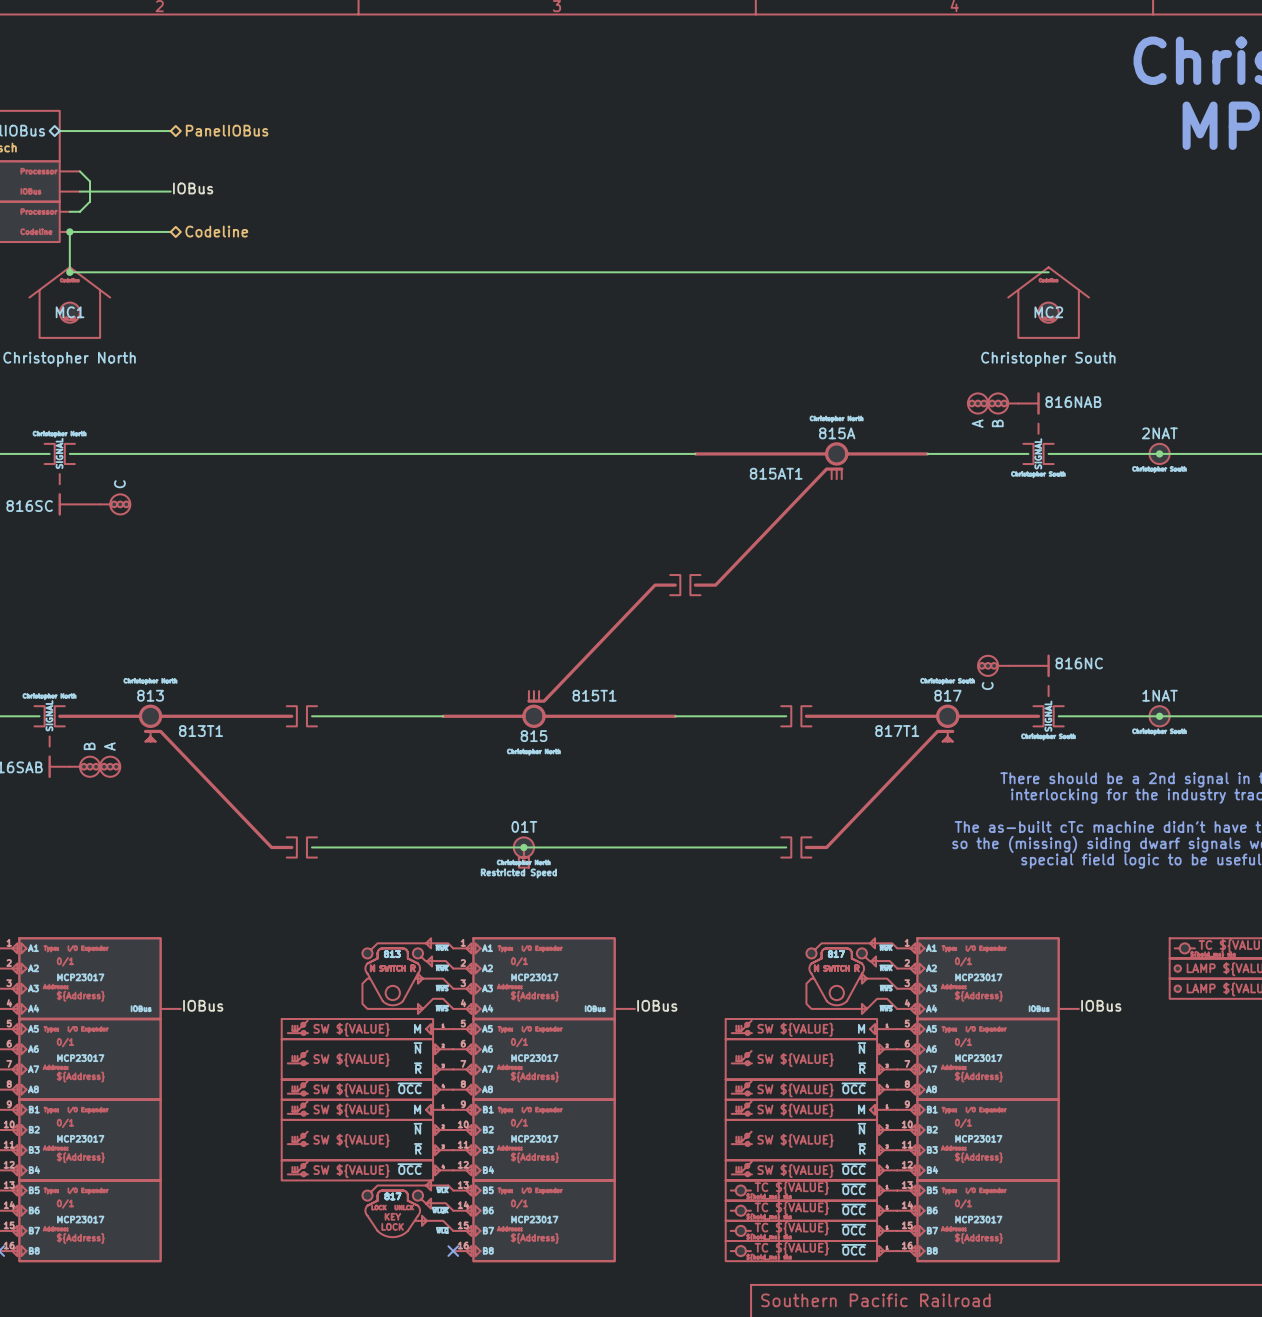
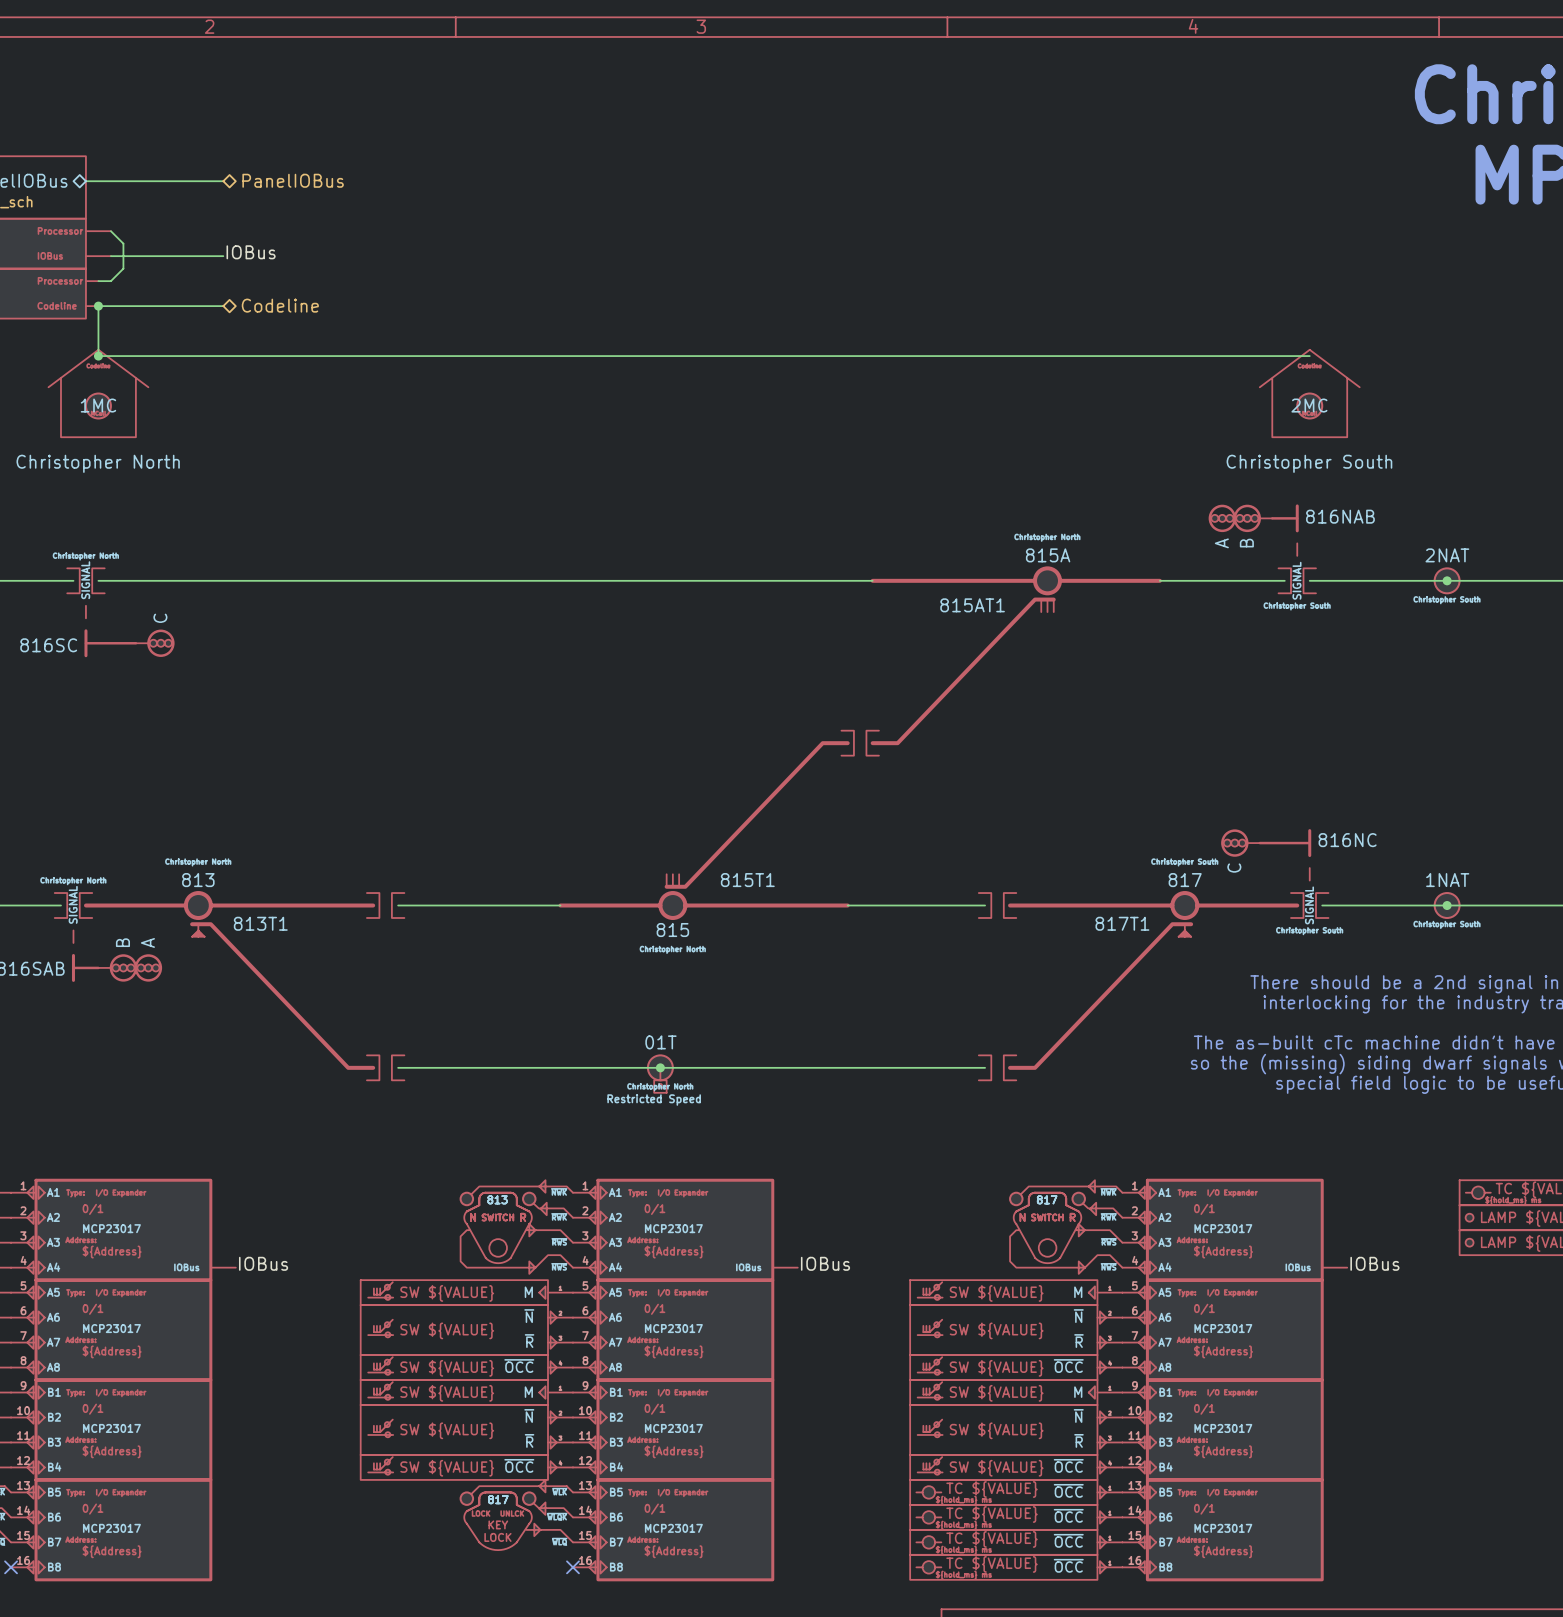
part text: none -> 1MC (98, 405)
part value: MC1 (70, 312) -> none
part text: none -> 2MC (1309, 405)
part value: MC2 (1048, 312) -> none

